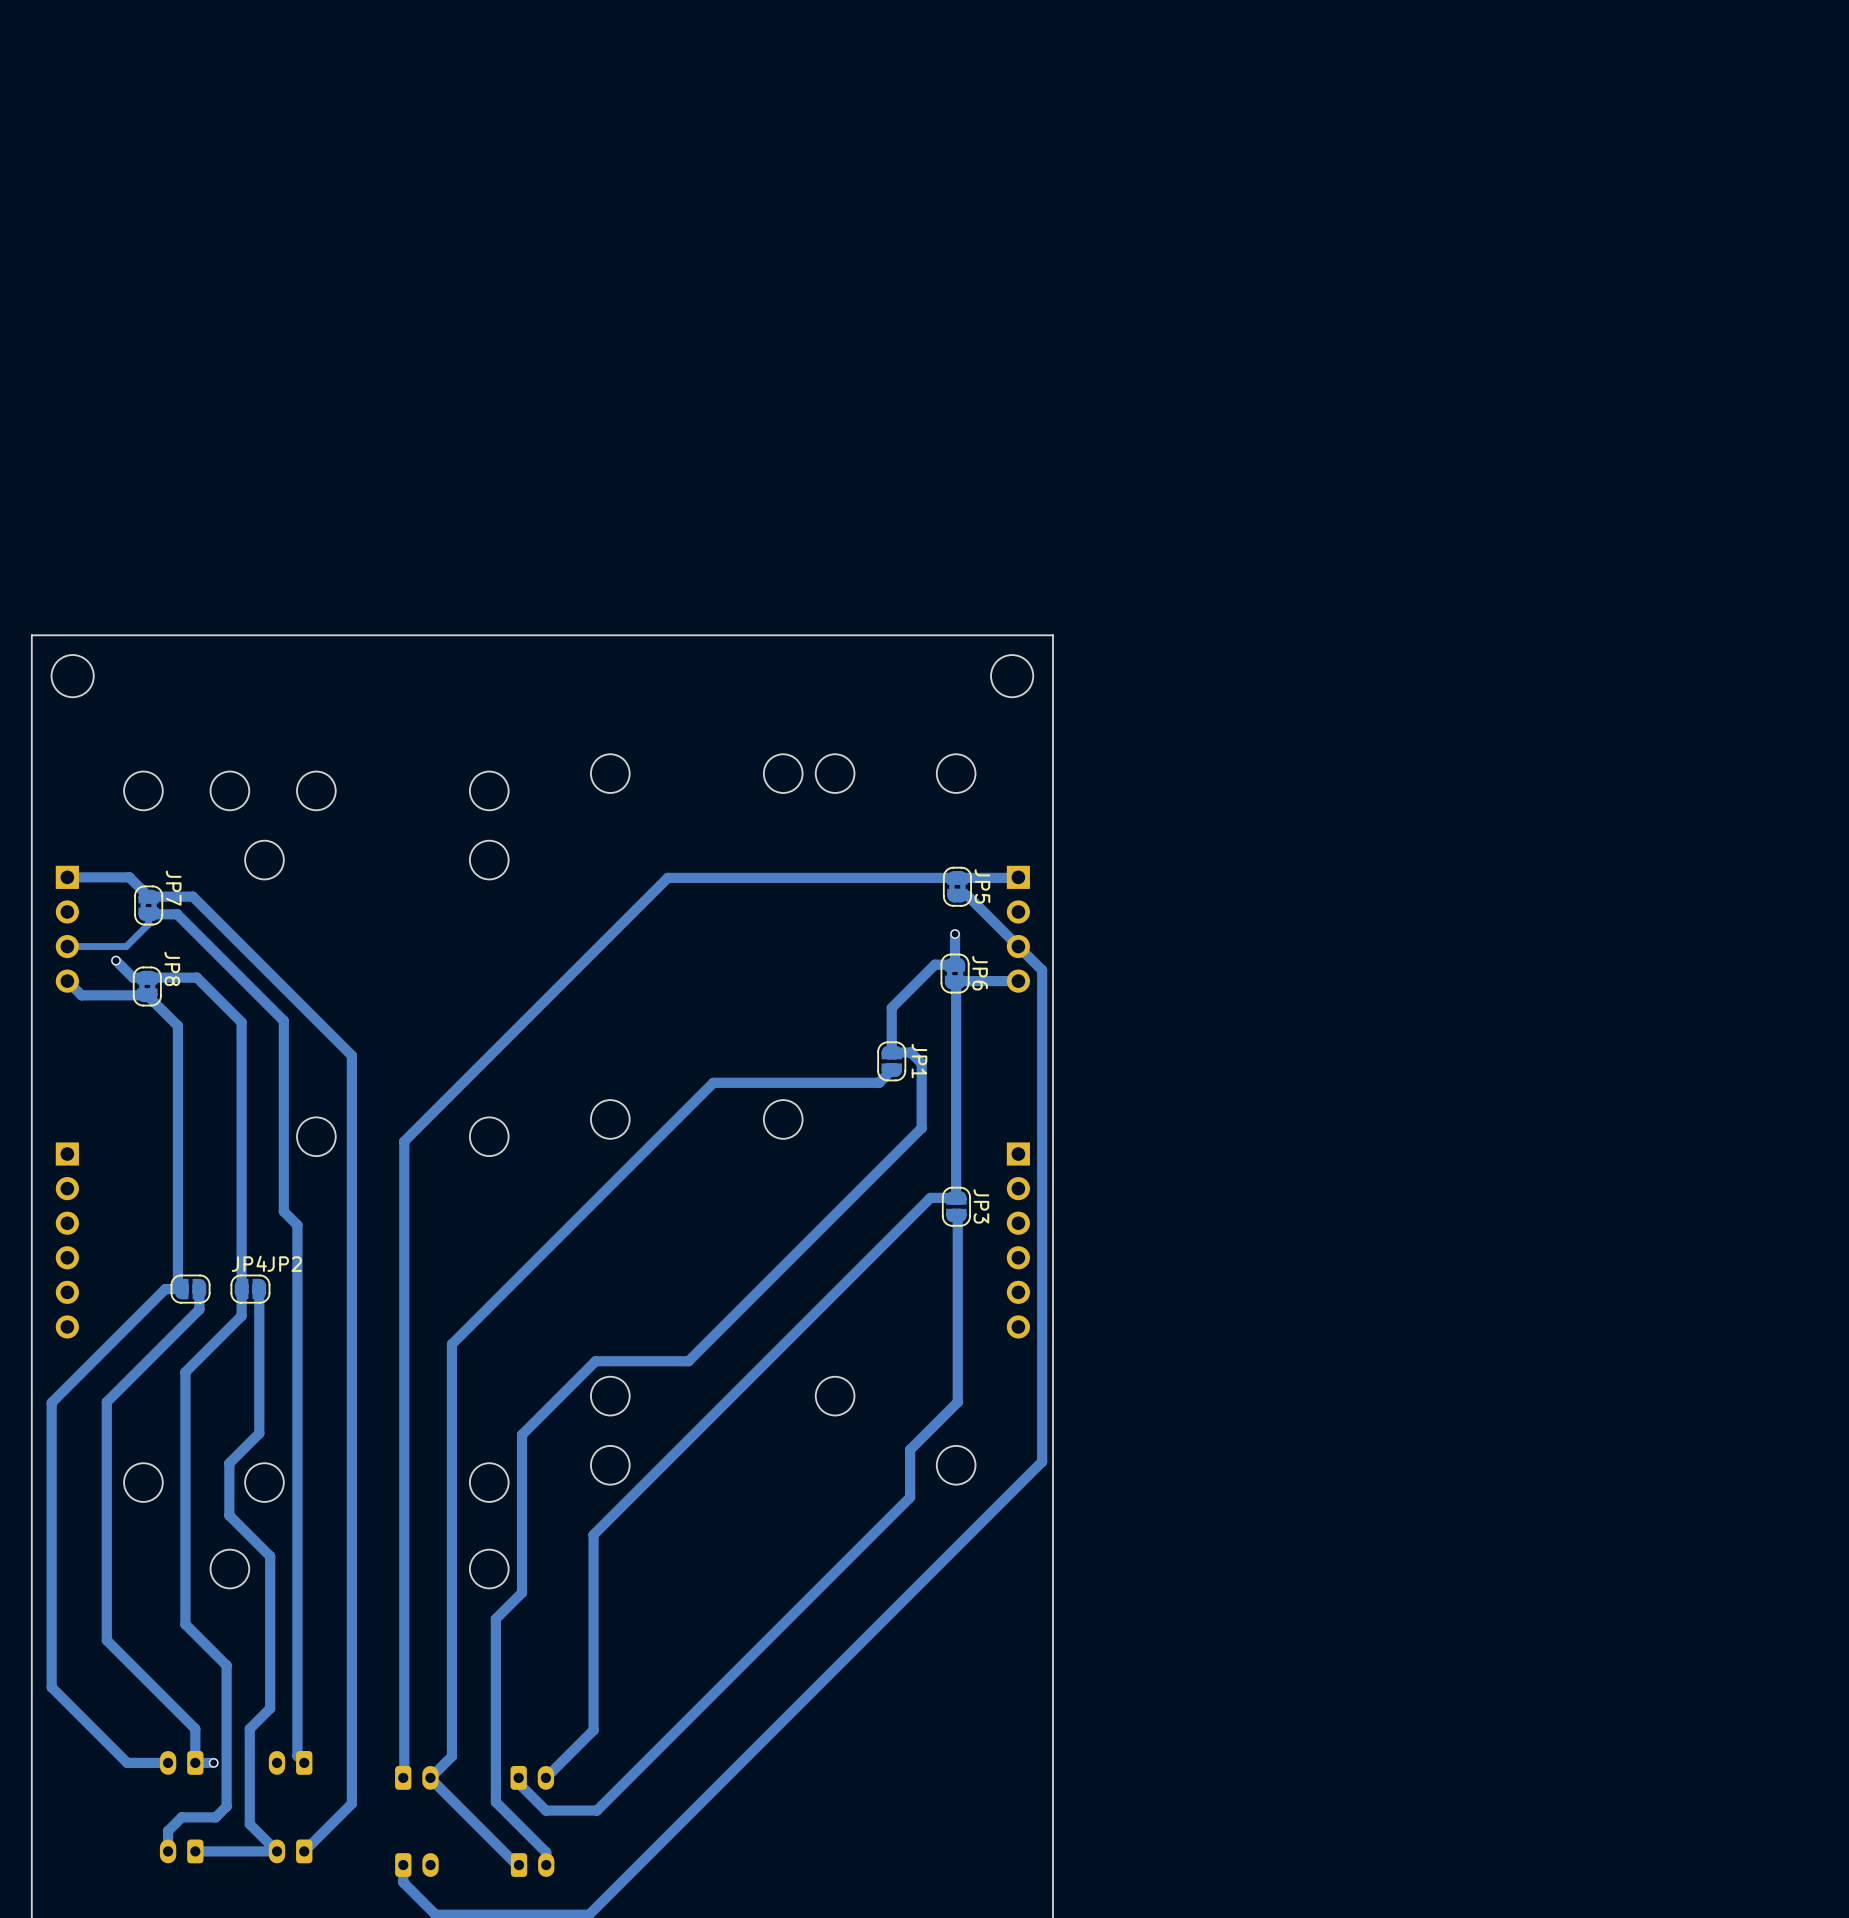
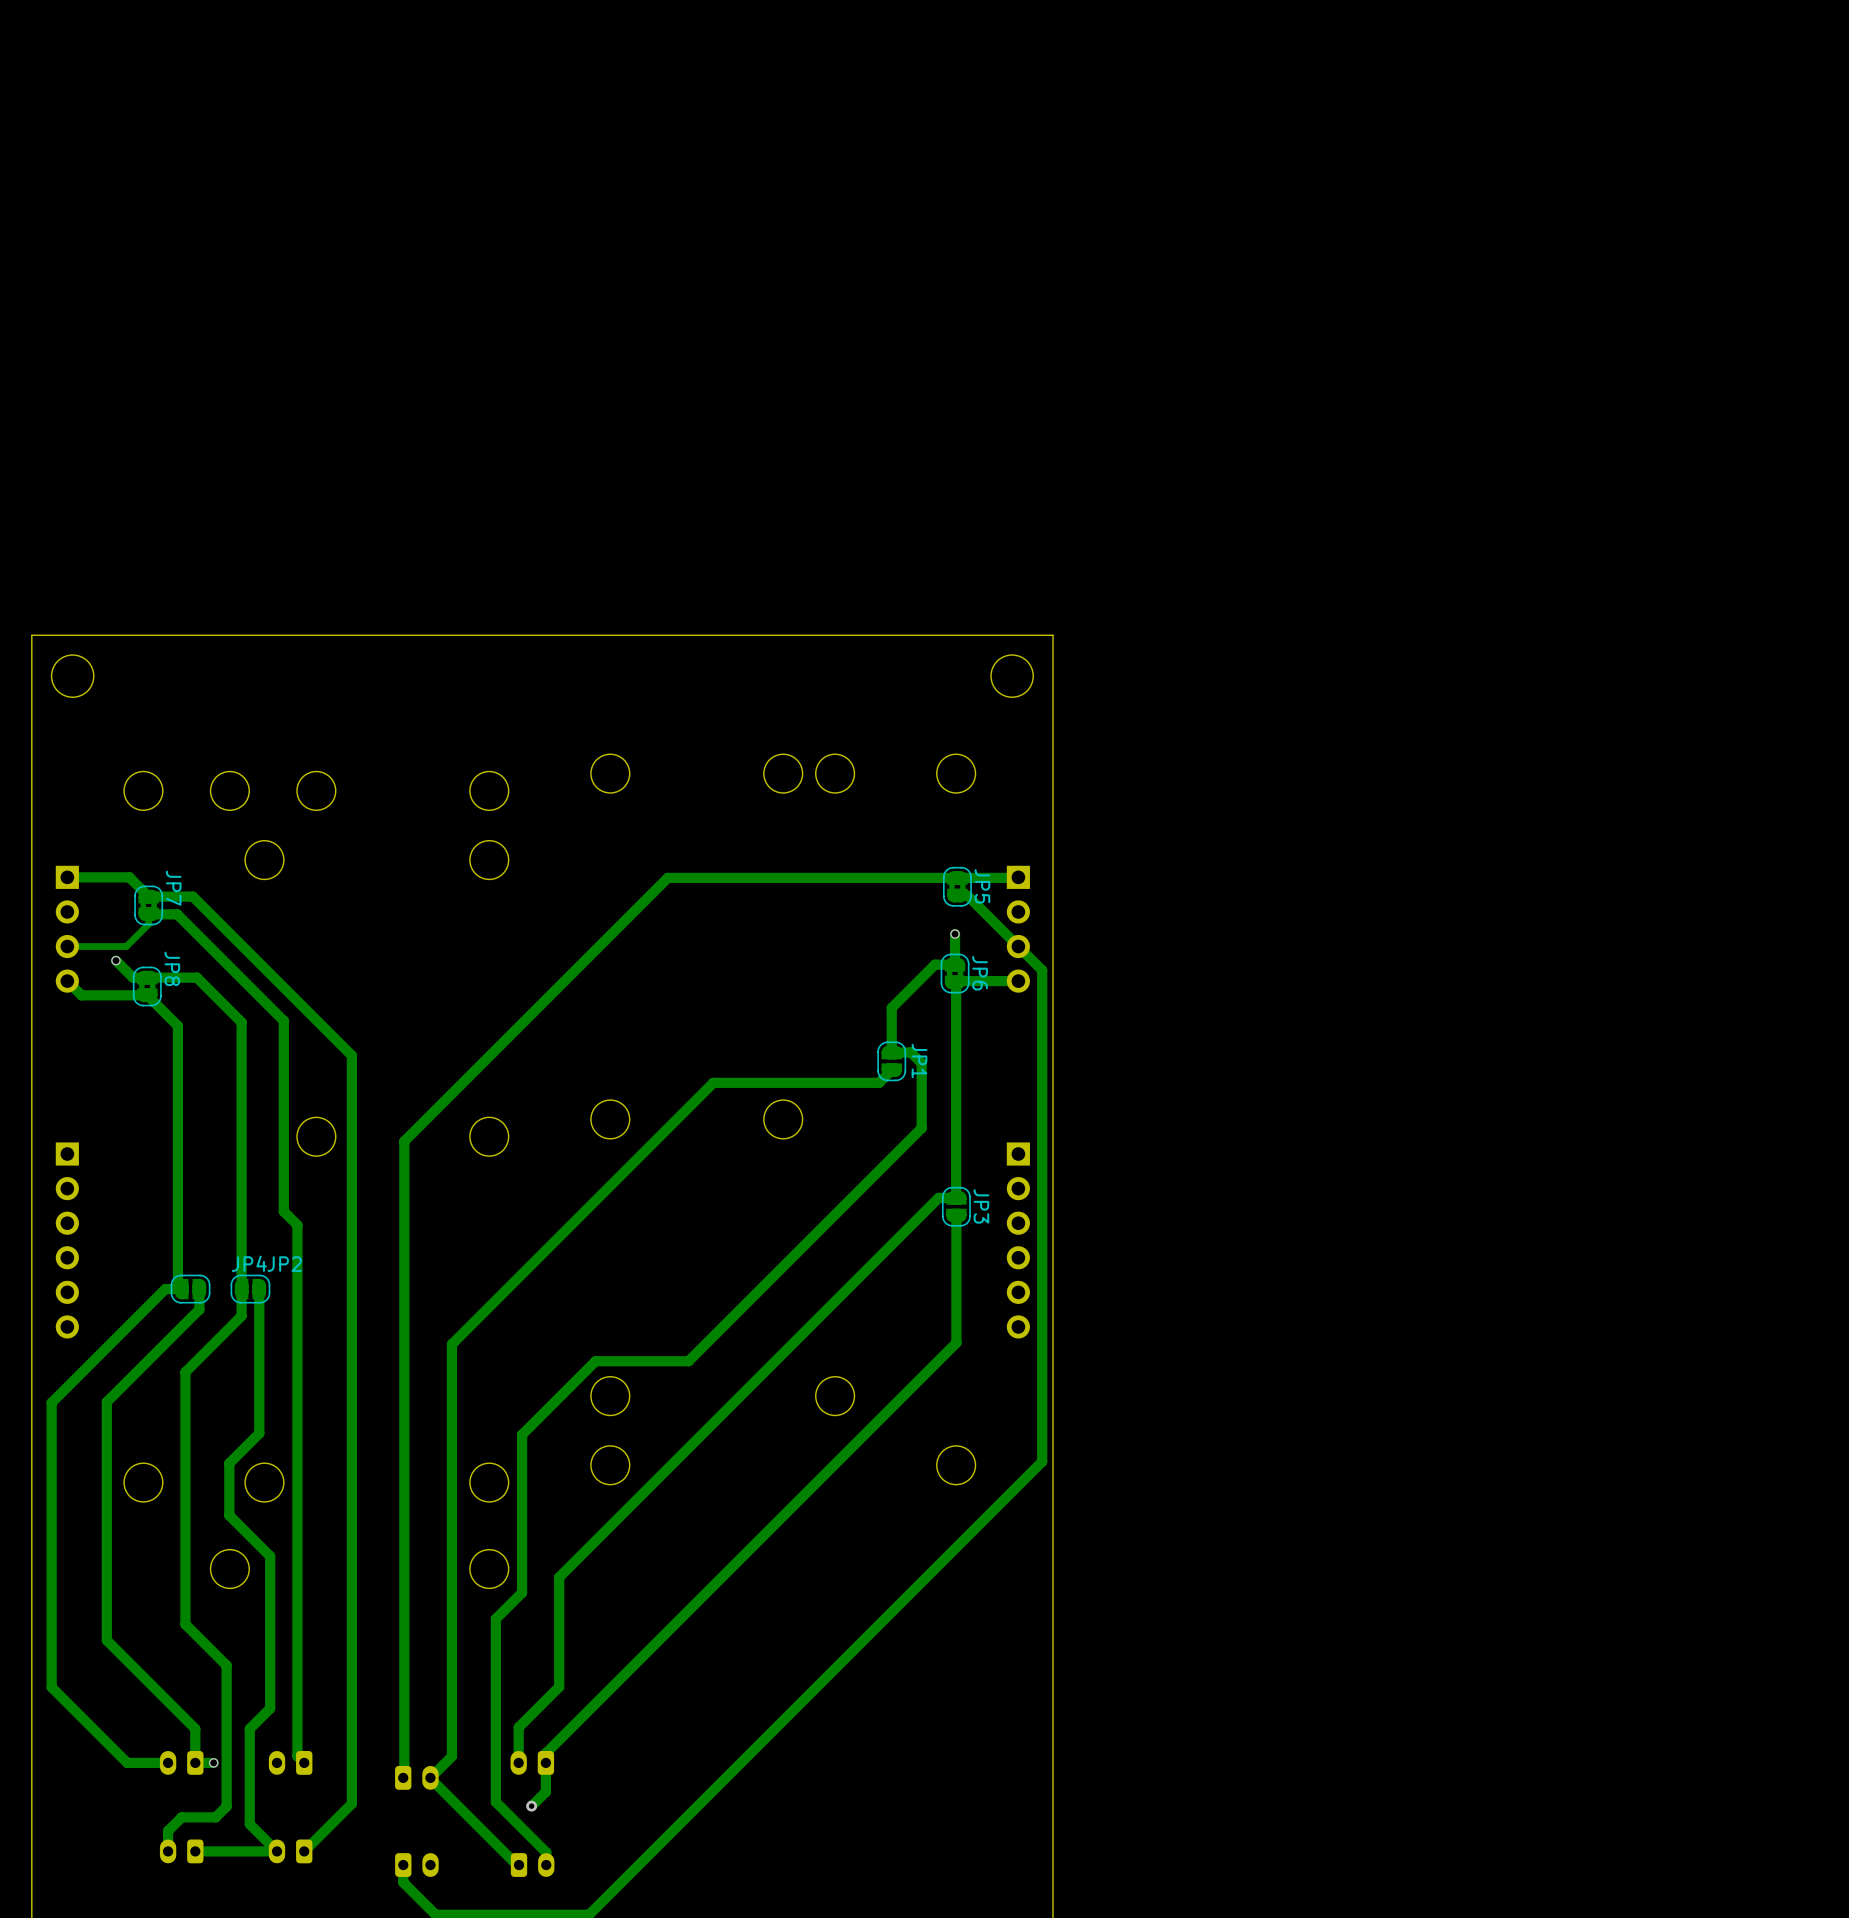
track: (938, 1197) (930, 1197) (593, 1534) (593, 1730) (545, 1777) -> (938, 1197) (559, 1577) (559, 1687) (518, 1727) (518, 1762)
track: (956, 1215) (957, 1402) (910, 1449) (910, 1497) (596, 1810) (545, 1810) (518, 1783) (518, 1777) -> (956, 1215) (956, 1342) (545, 1753) (545, 1791) (531, 1806)
part rotation: 0° (532, 1777) -> 180° (532, 1762)
via: none -> (531, 1806)

